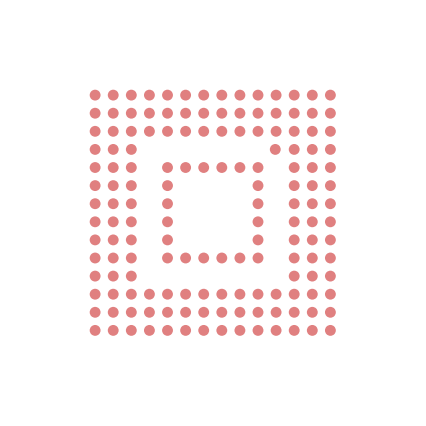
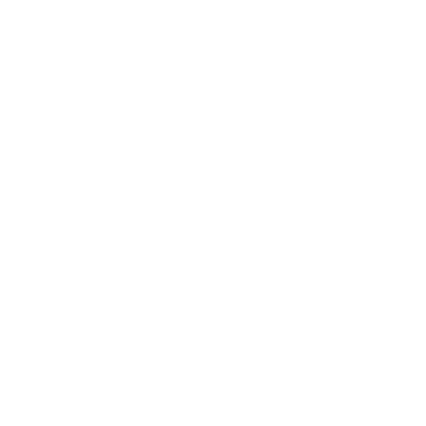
part: (212, 212) -> none

